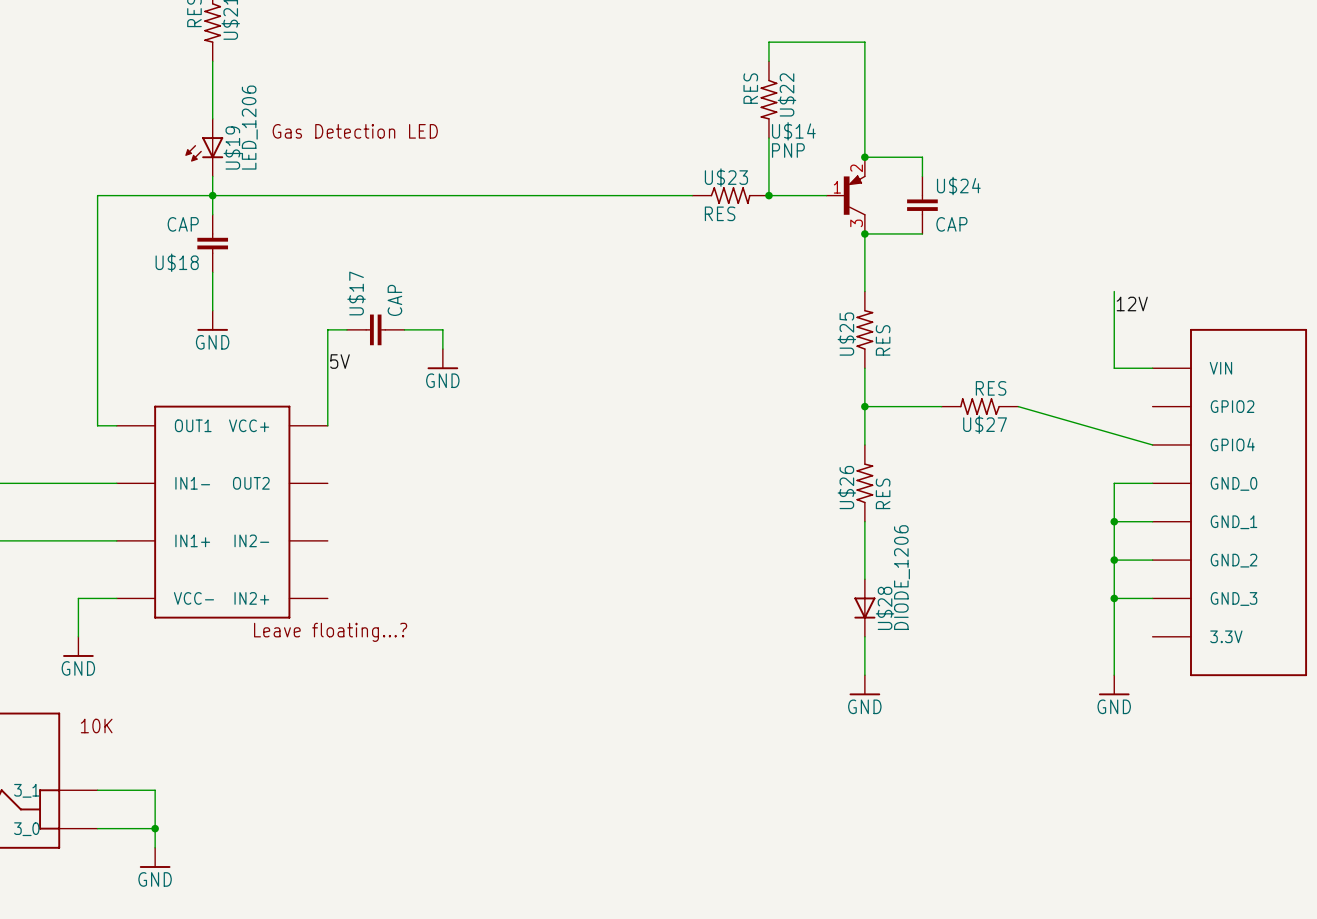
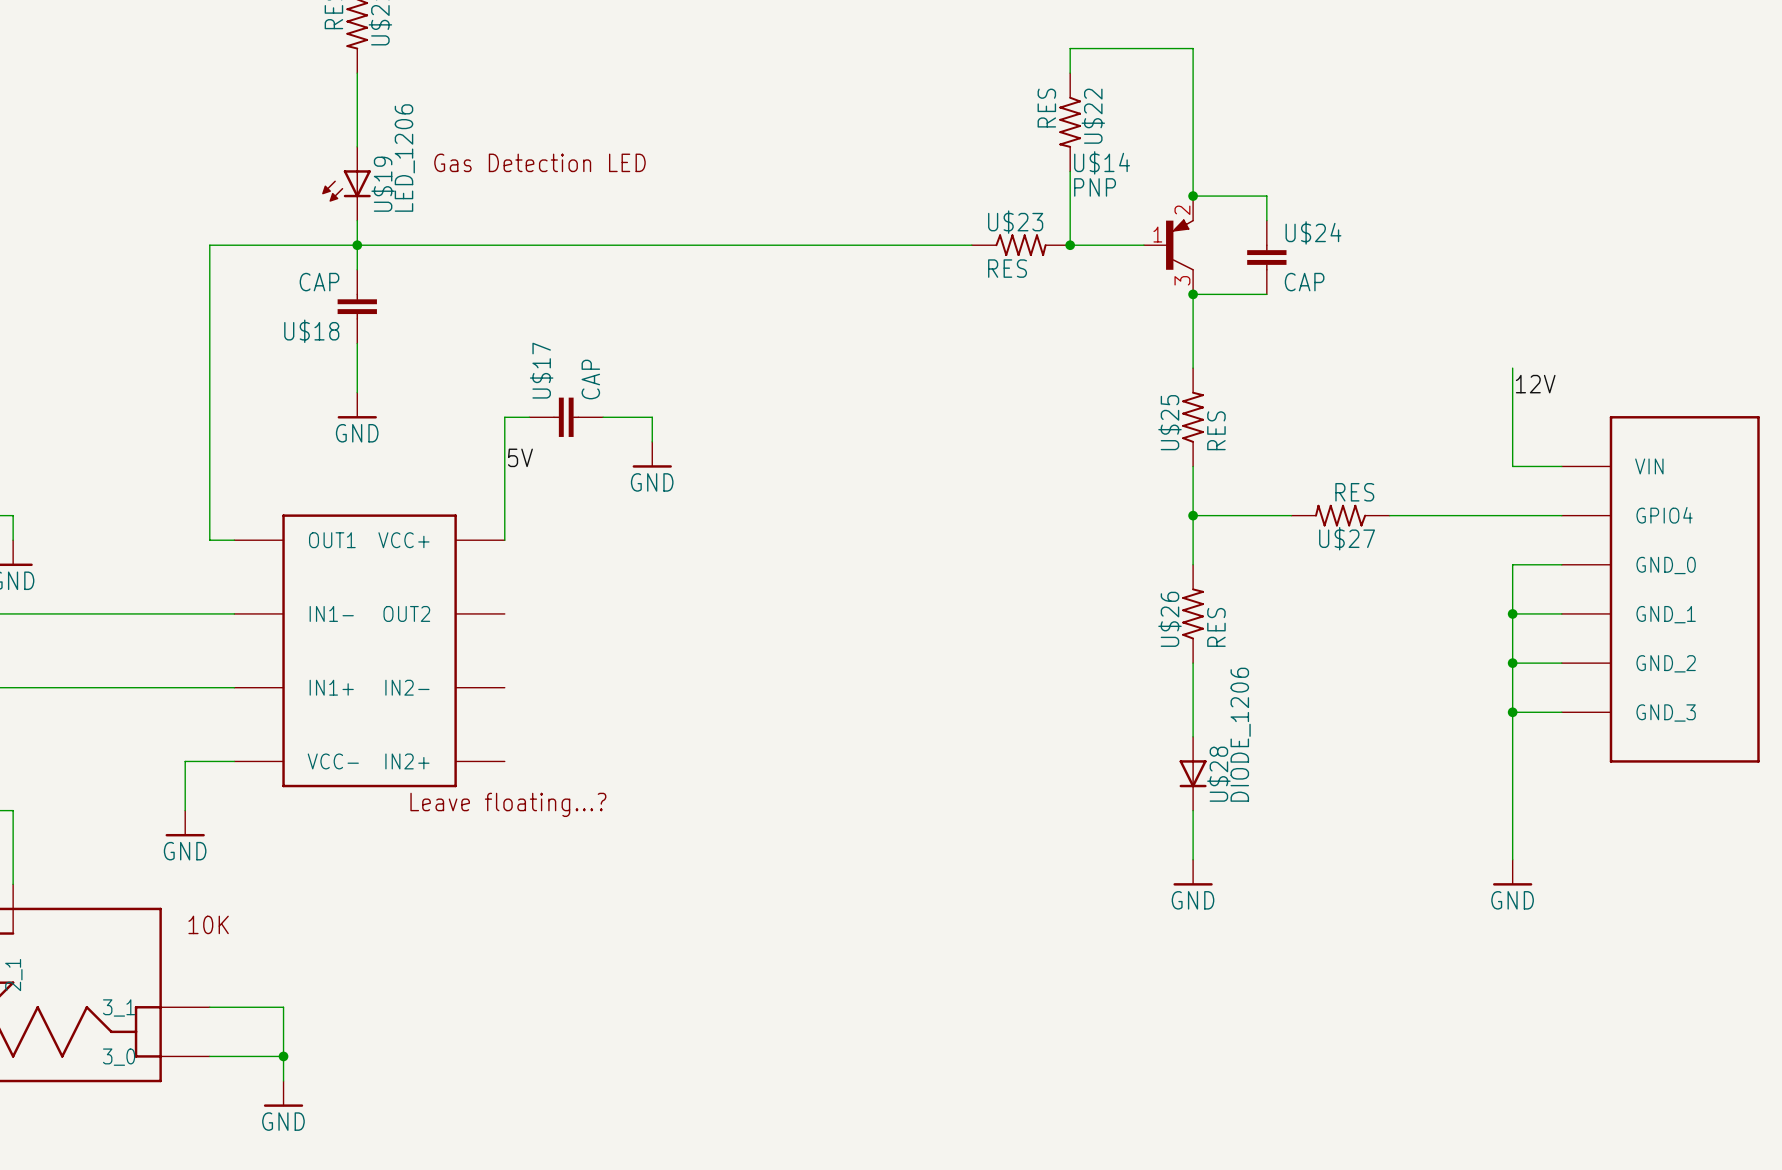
wire: (1018, 406) (1152, 444) -> (1389, 515) (1561, 515)
wire: none -> (1561, 564) (1512, 564) (1512, 613)
part: none -> (1660, 589)
junction: none -> (1512, 613)
part: (1229, 502) -> none
wire: (1114, 598) (1152, 598) -> none
junction: (1114, 598) -> none

